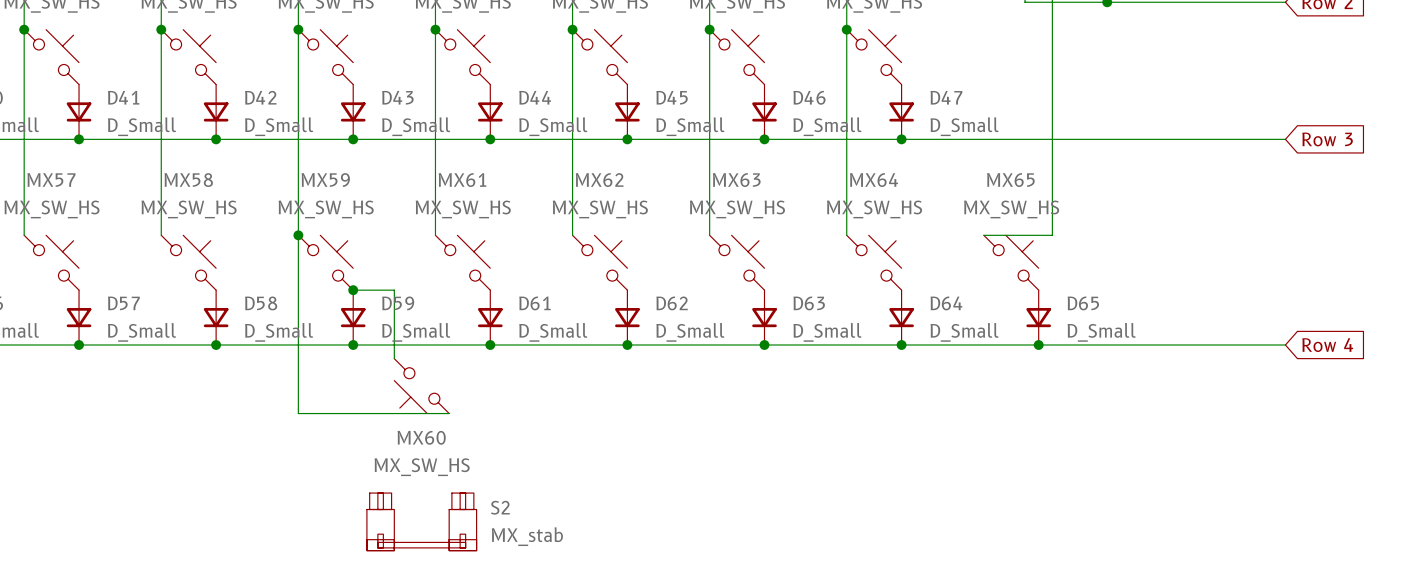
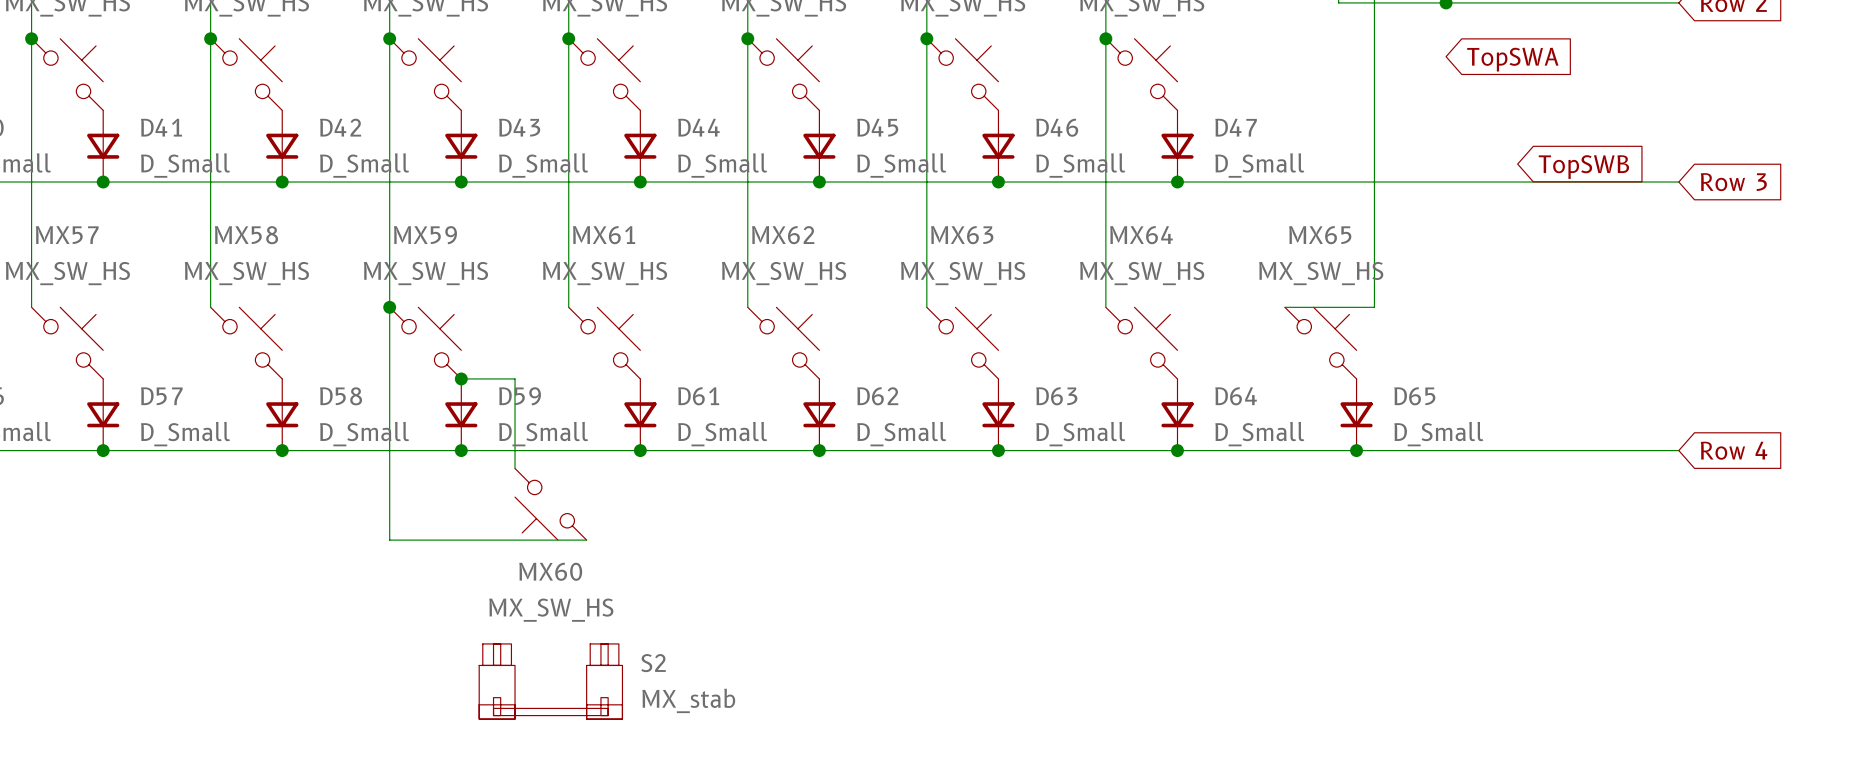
global label: none -> TopSWA (1512, 59)
global label: none -> TopSWB (1583, 167)

